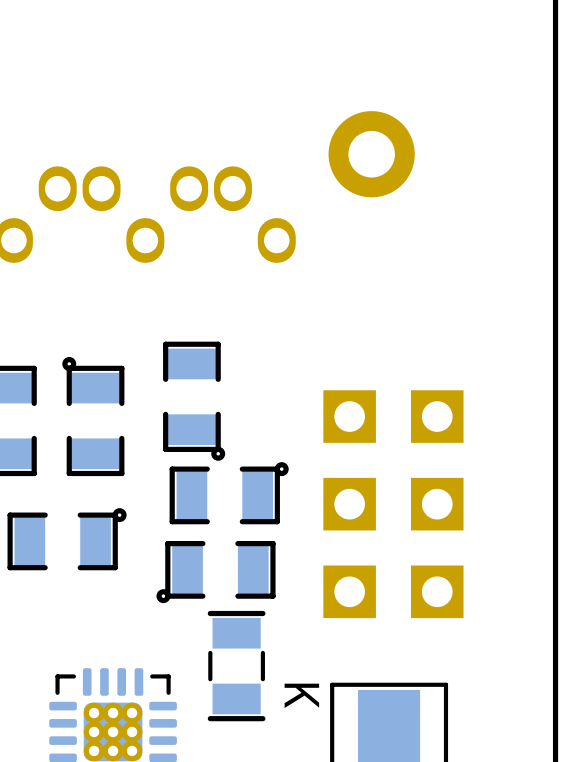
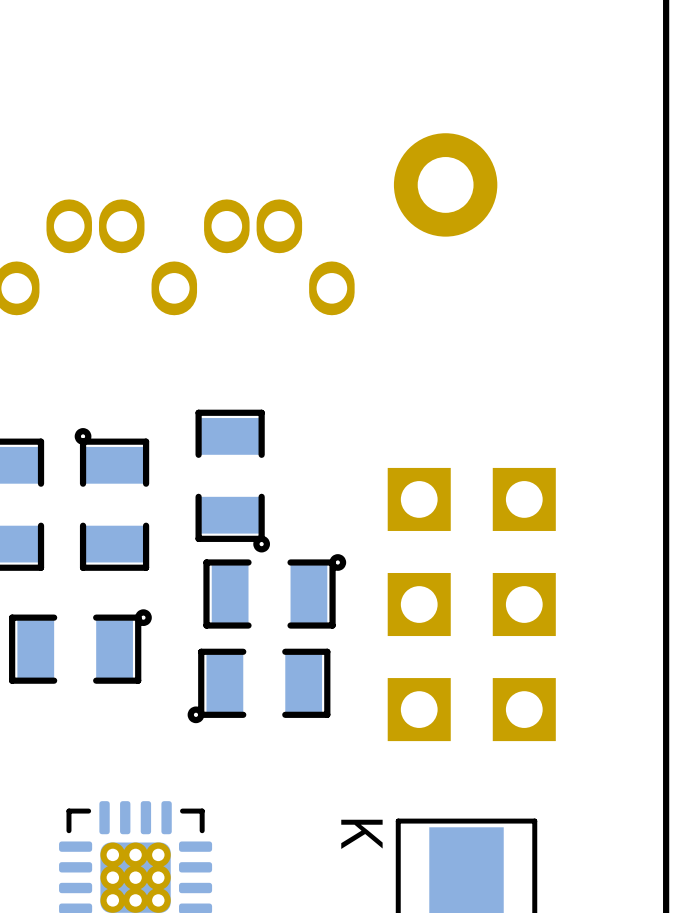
part: (236, 666) -> none

